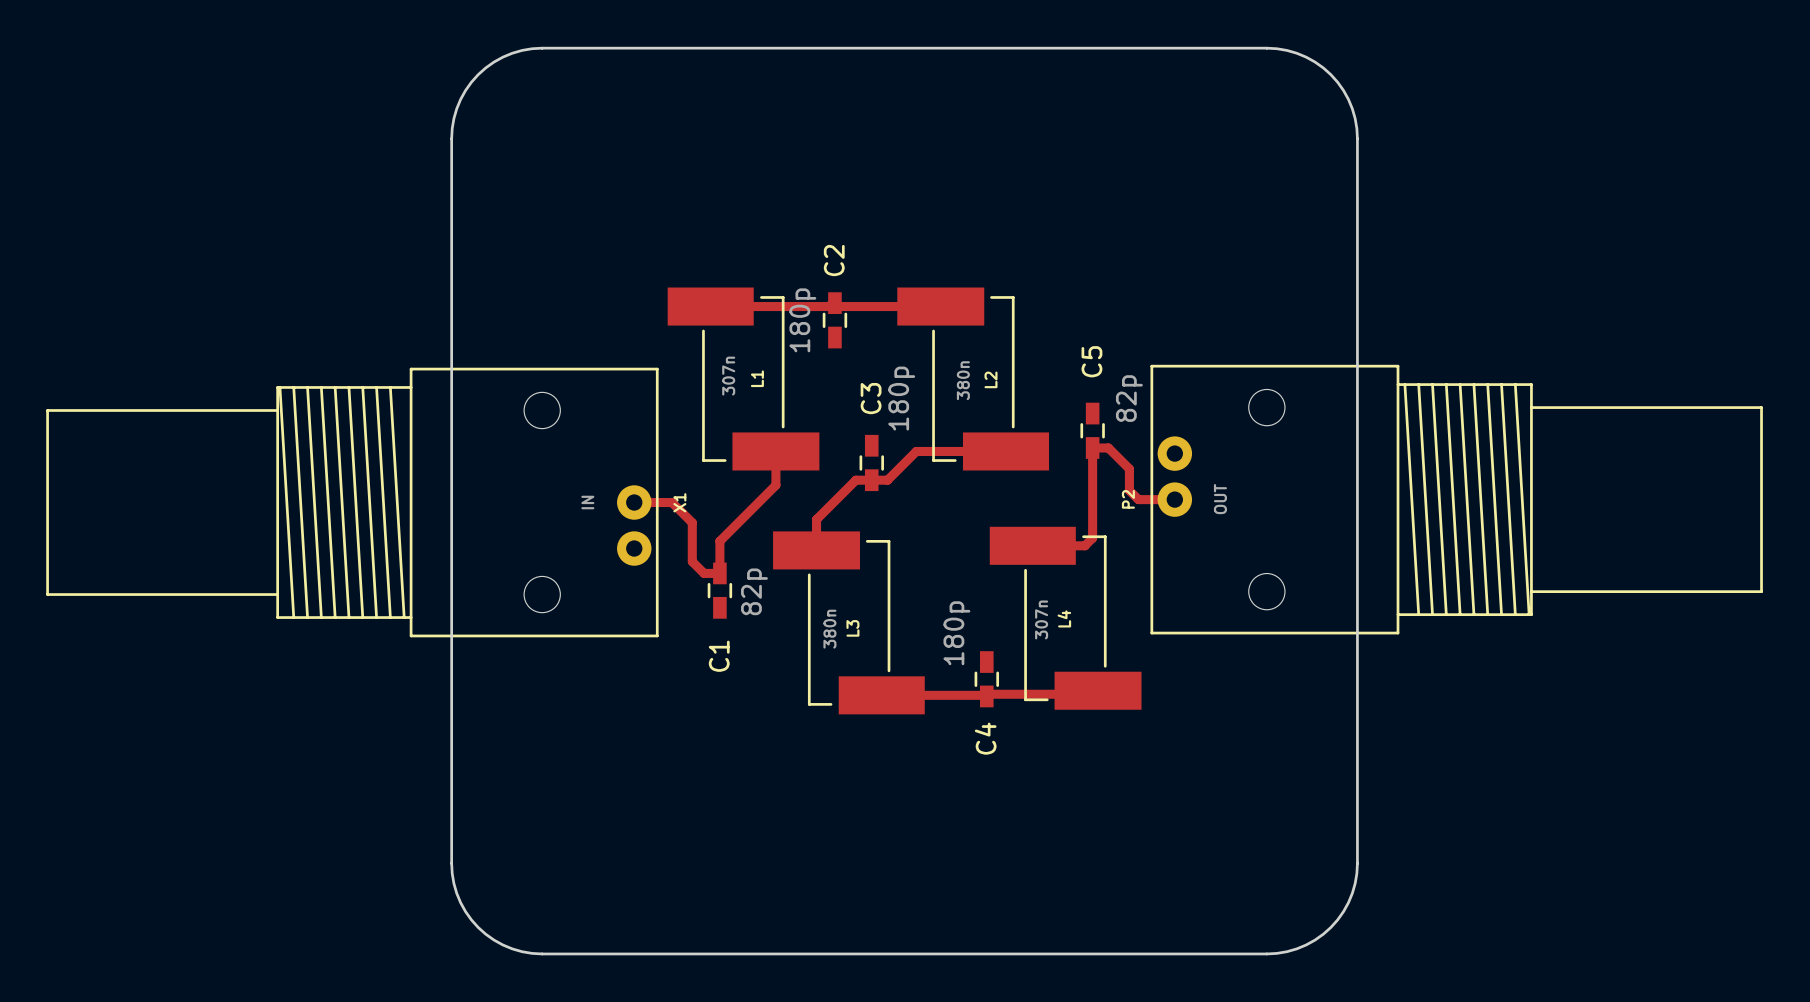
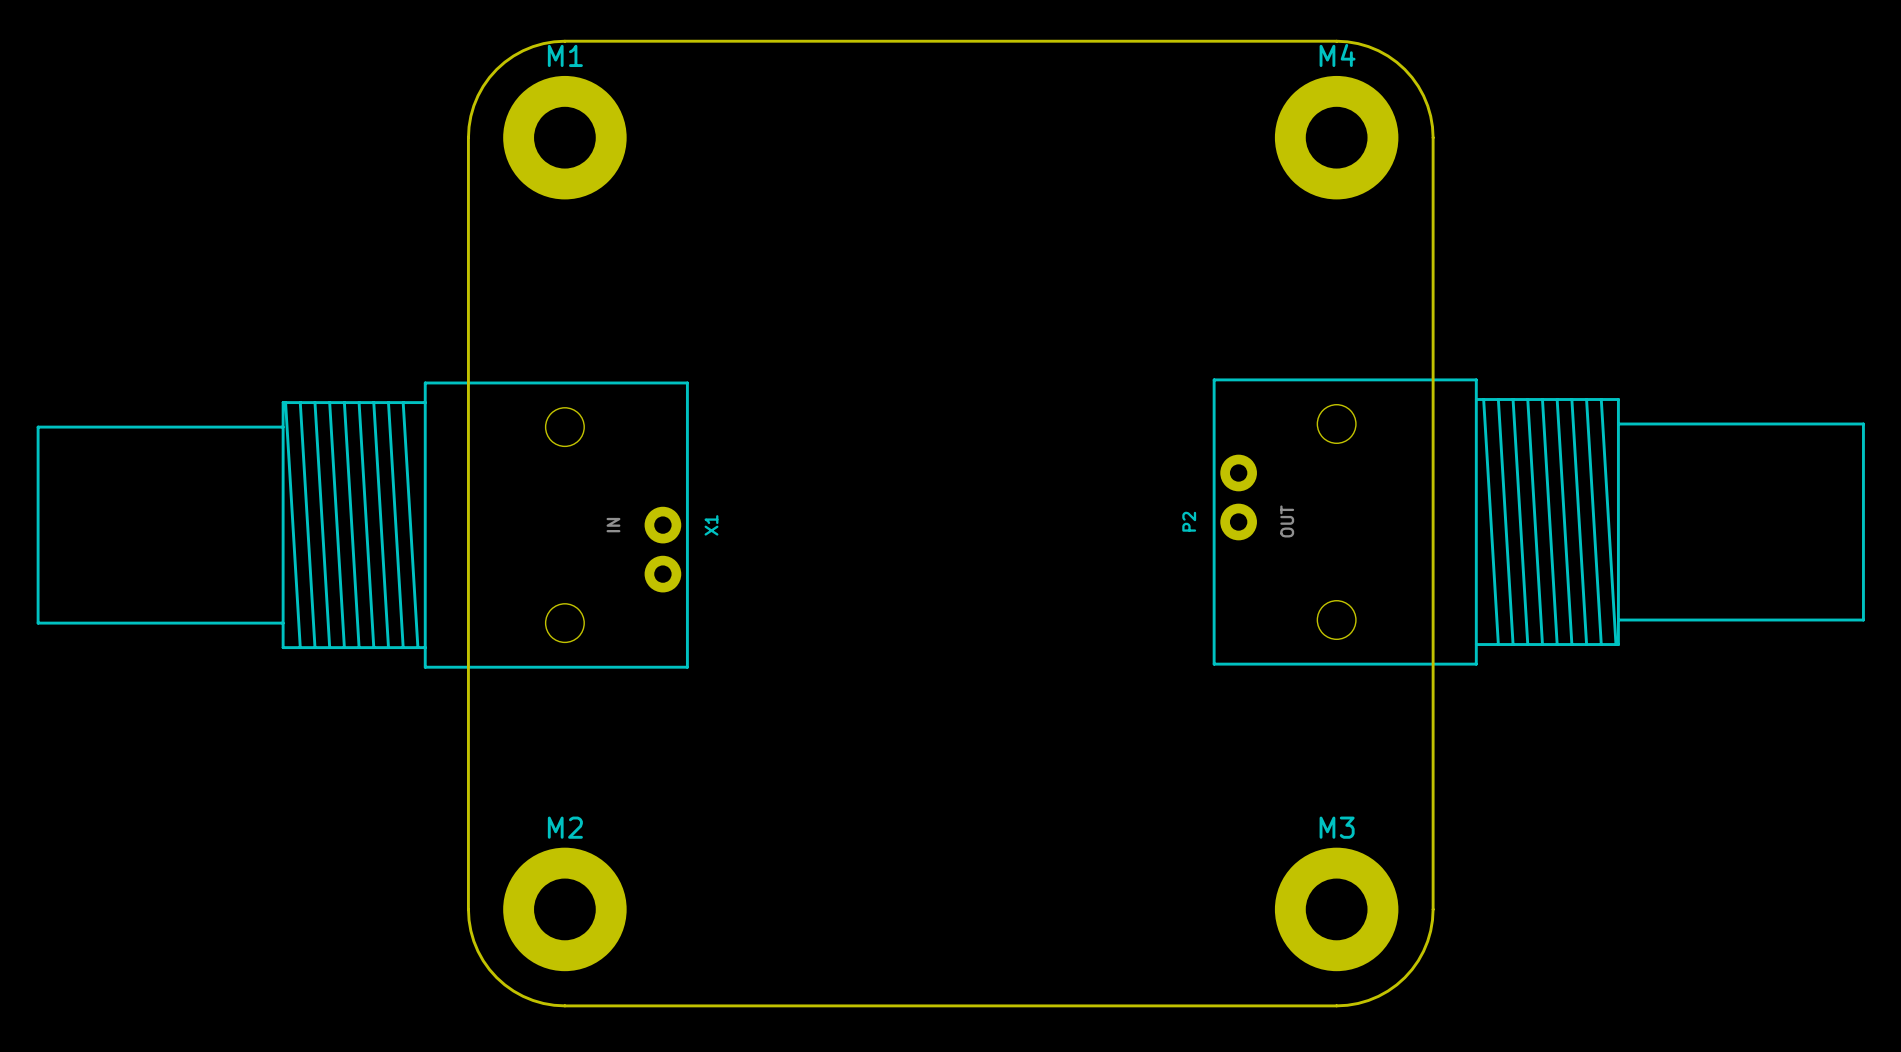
M1: none -> (564, 137)
M4: none -> (1336, 137)
top track: (710, 306) (940, 306) -> none
C2: 180p (834, 320) -> none
L1: 307n (743, 379) -> none
L2: 380n (973, 379) -> none
C5: 82p (1092, 430) -> none
top track: (775, 451) (775, 485) (719, 541) (719, 573) (704, 573) (692, 561) (692, 522) (672, 502) (634, 502) -> none
top track: (1005, 451) (916, 451) (887, 480) (855, 480) (816, 519) (816, 550) -> none
C3: 180p (871, 462) -> none
top track: (1174, 499) (1138, 499) (1129, 490) (1129, 468) (1108, 447) (1092, 447) (1092, 538) (1084, 545) (1032, 545) -> none
C1: 82p (719, 590) -> none
L4: 307n (1065, 618) -> none
L3: 380n (848, 622) -> none
C4: 180p (986, 679) -> none
top track: (1098, 690) (1094, 694) (881, 695) -> none
M2: none -> (564, 909)
M3: none -> (1336, 909)

